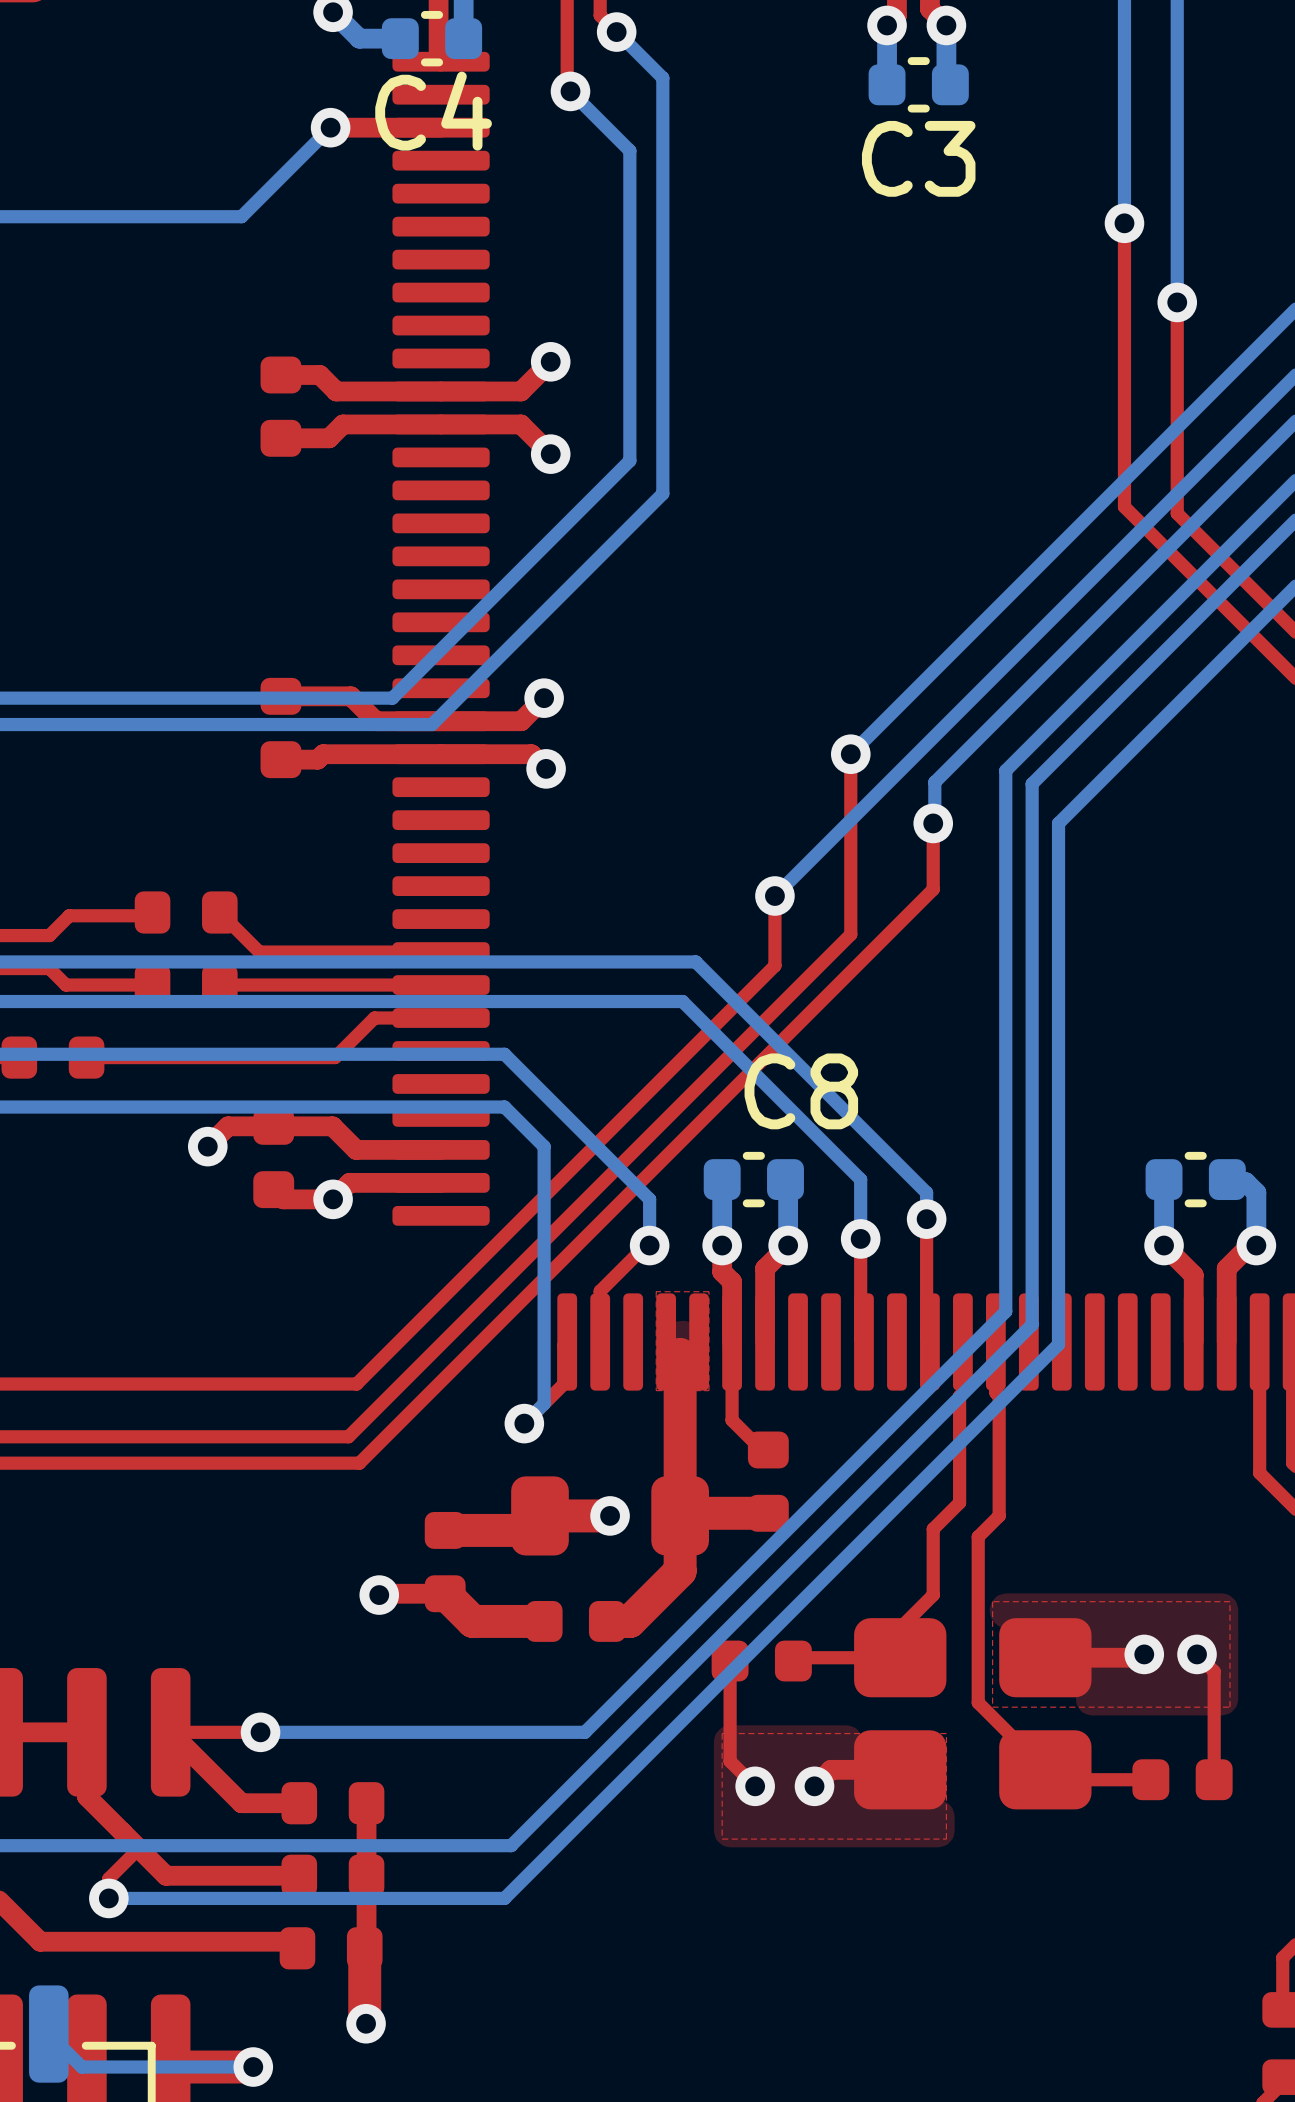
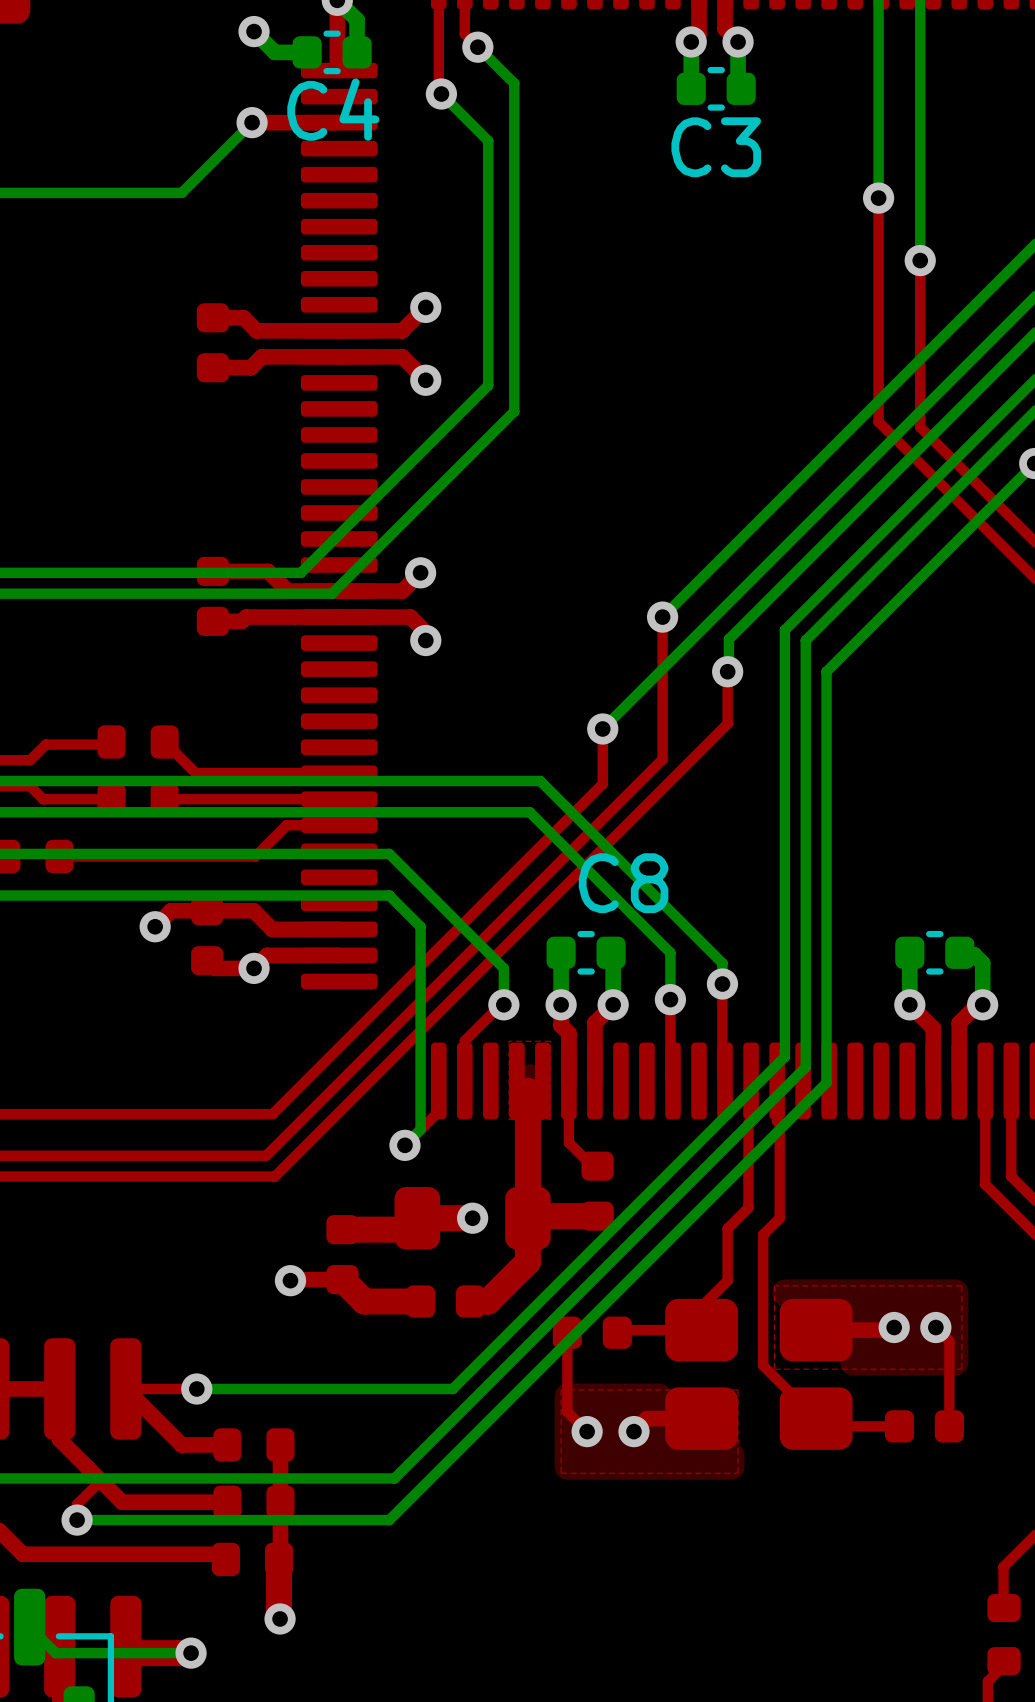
via position: (546, 768) -> (425, 640)

